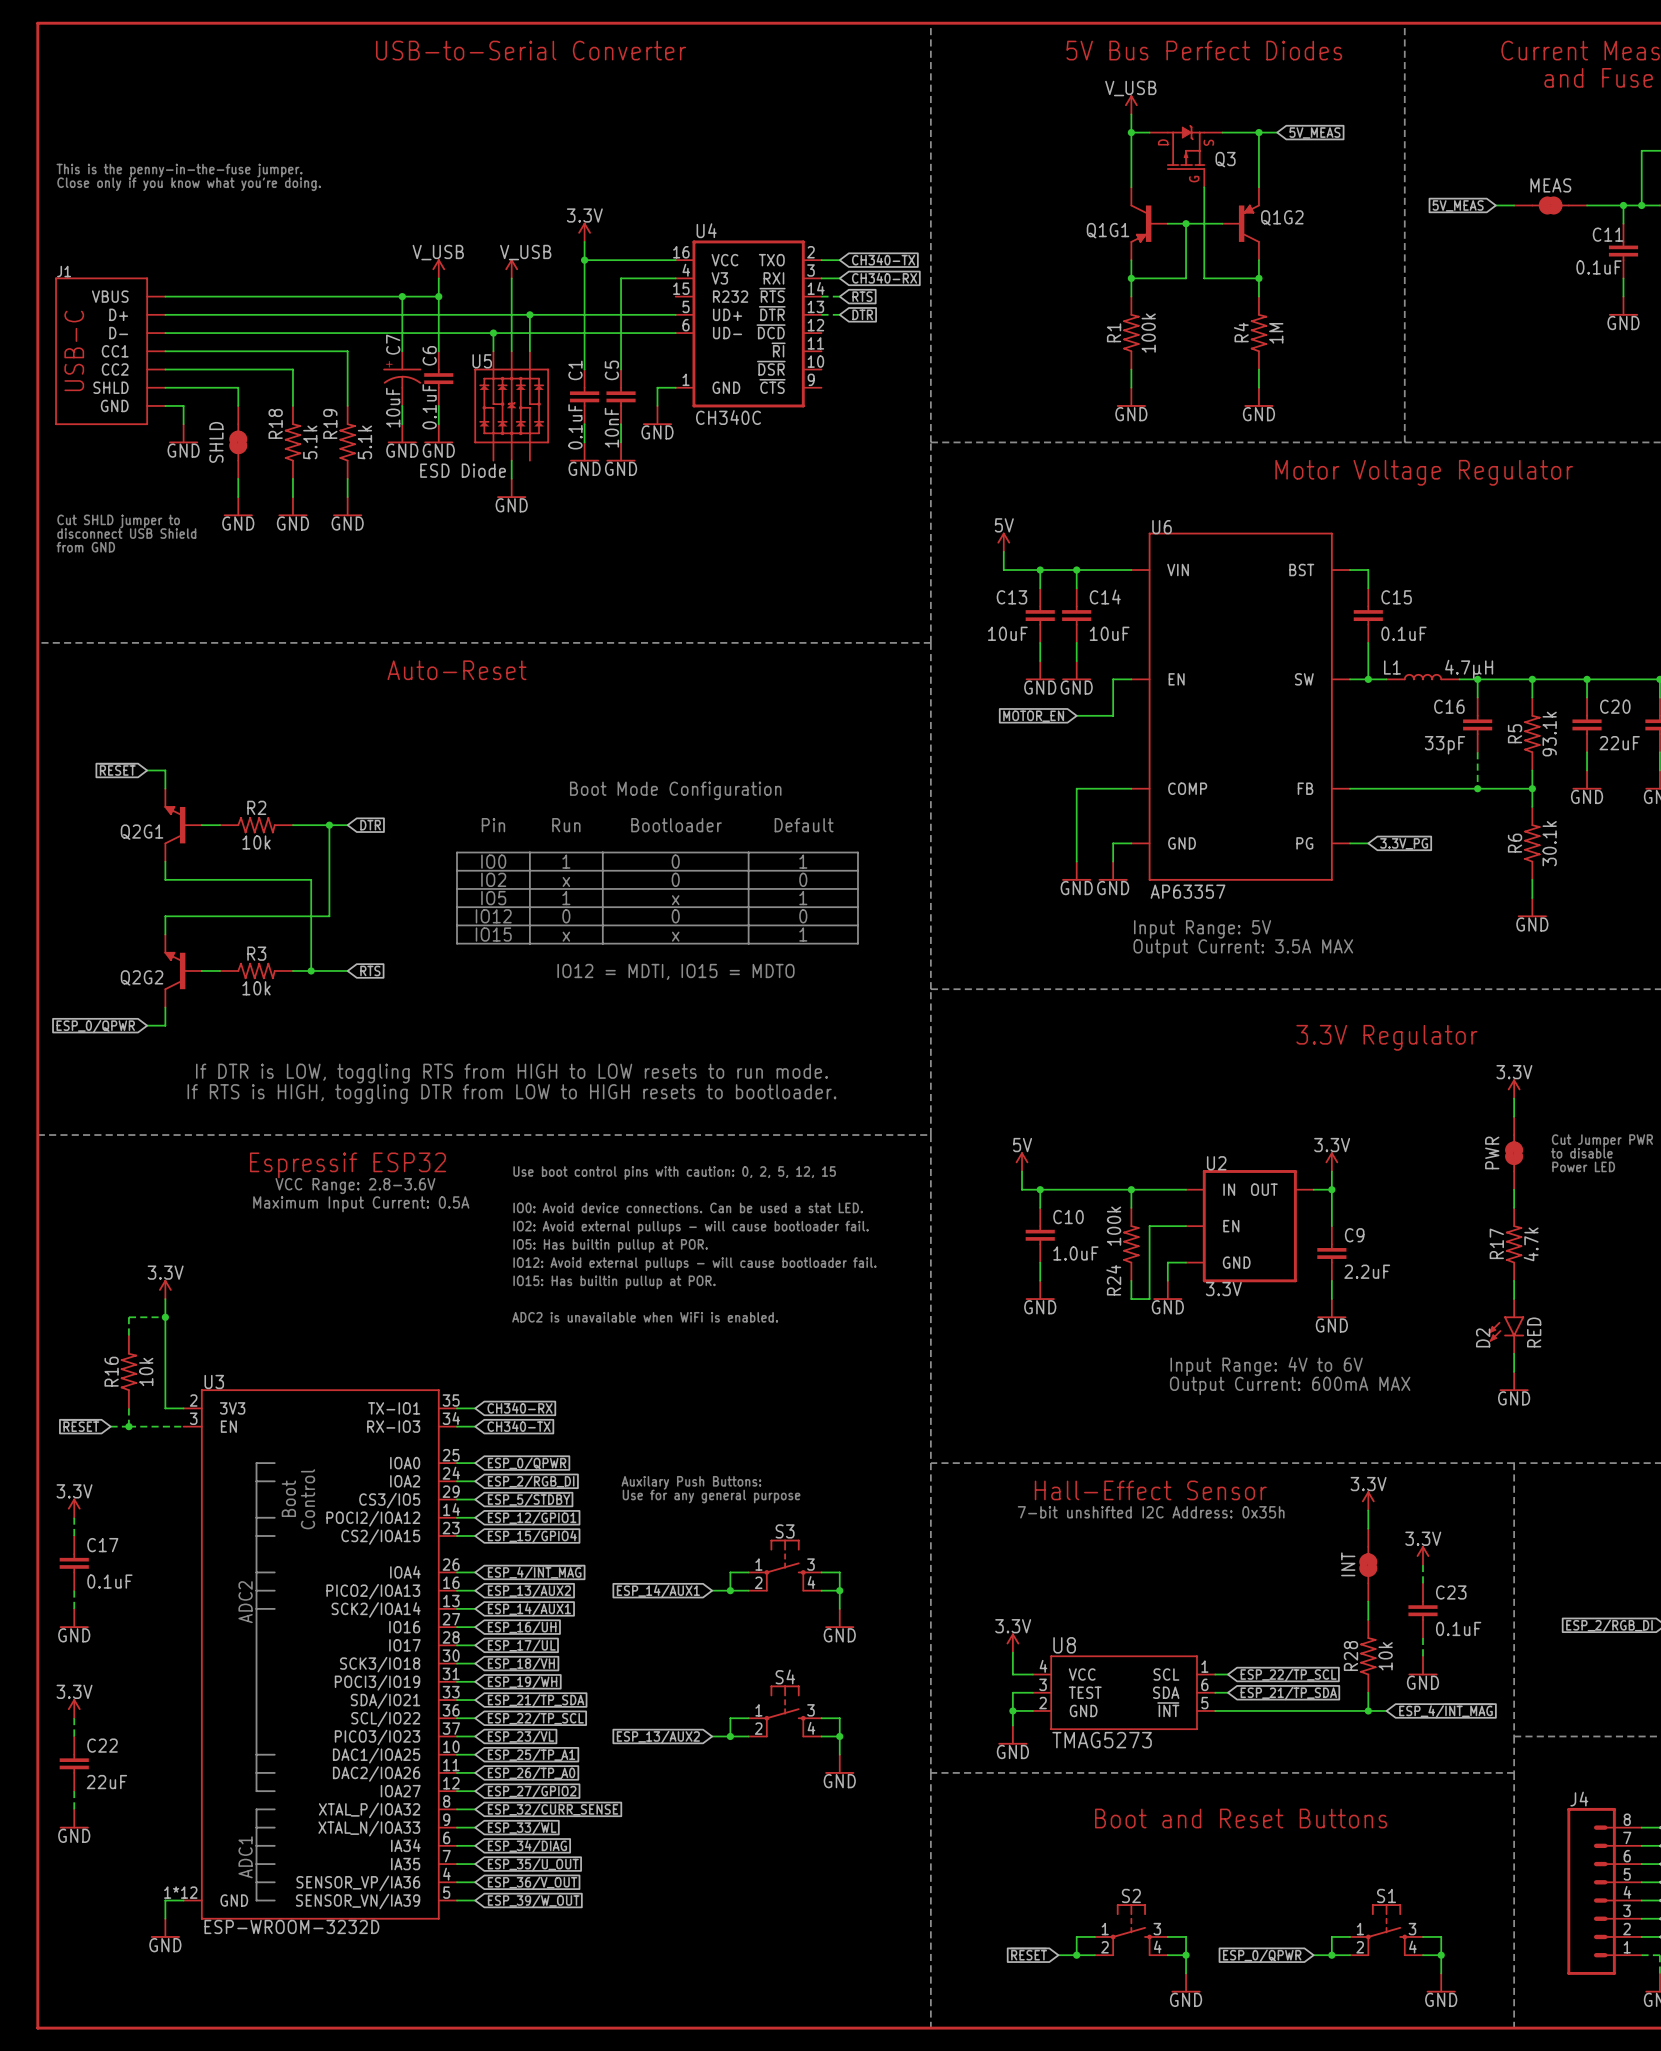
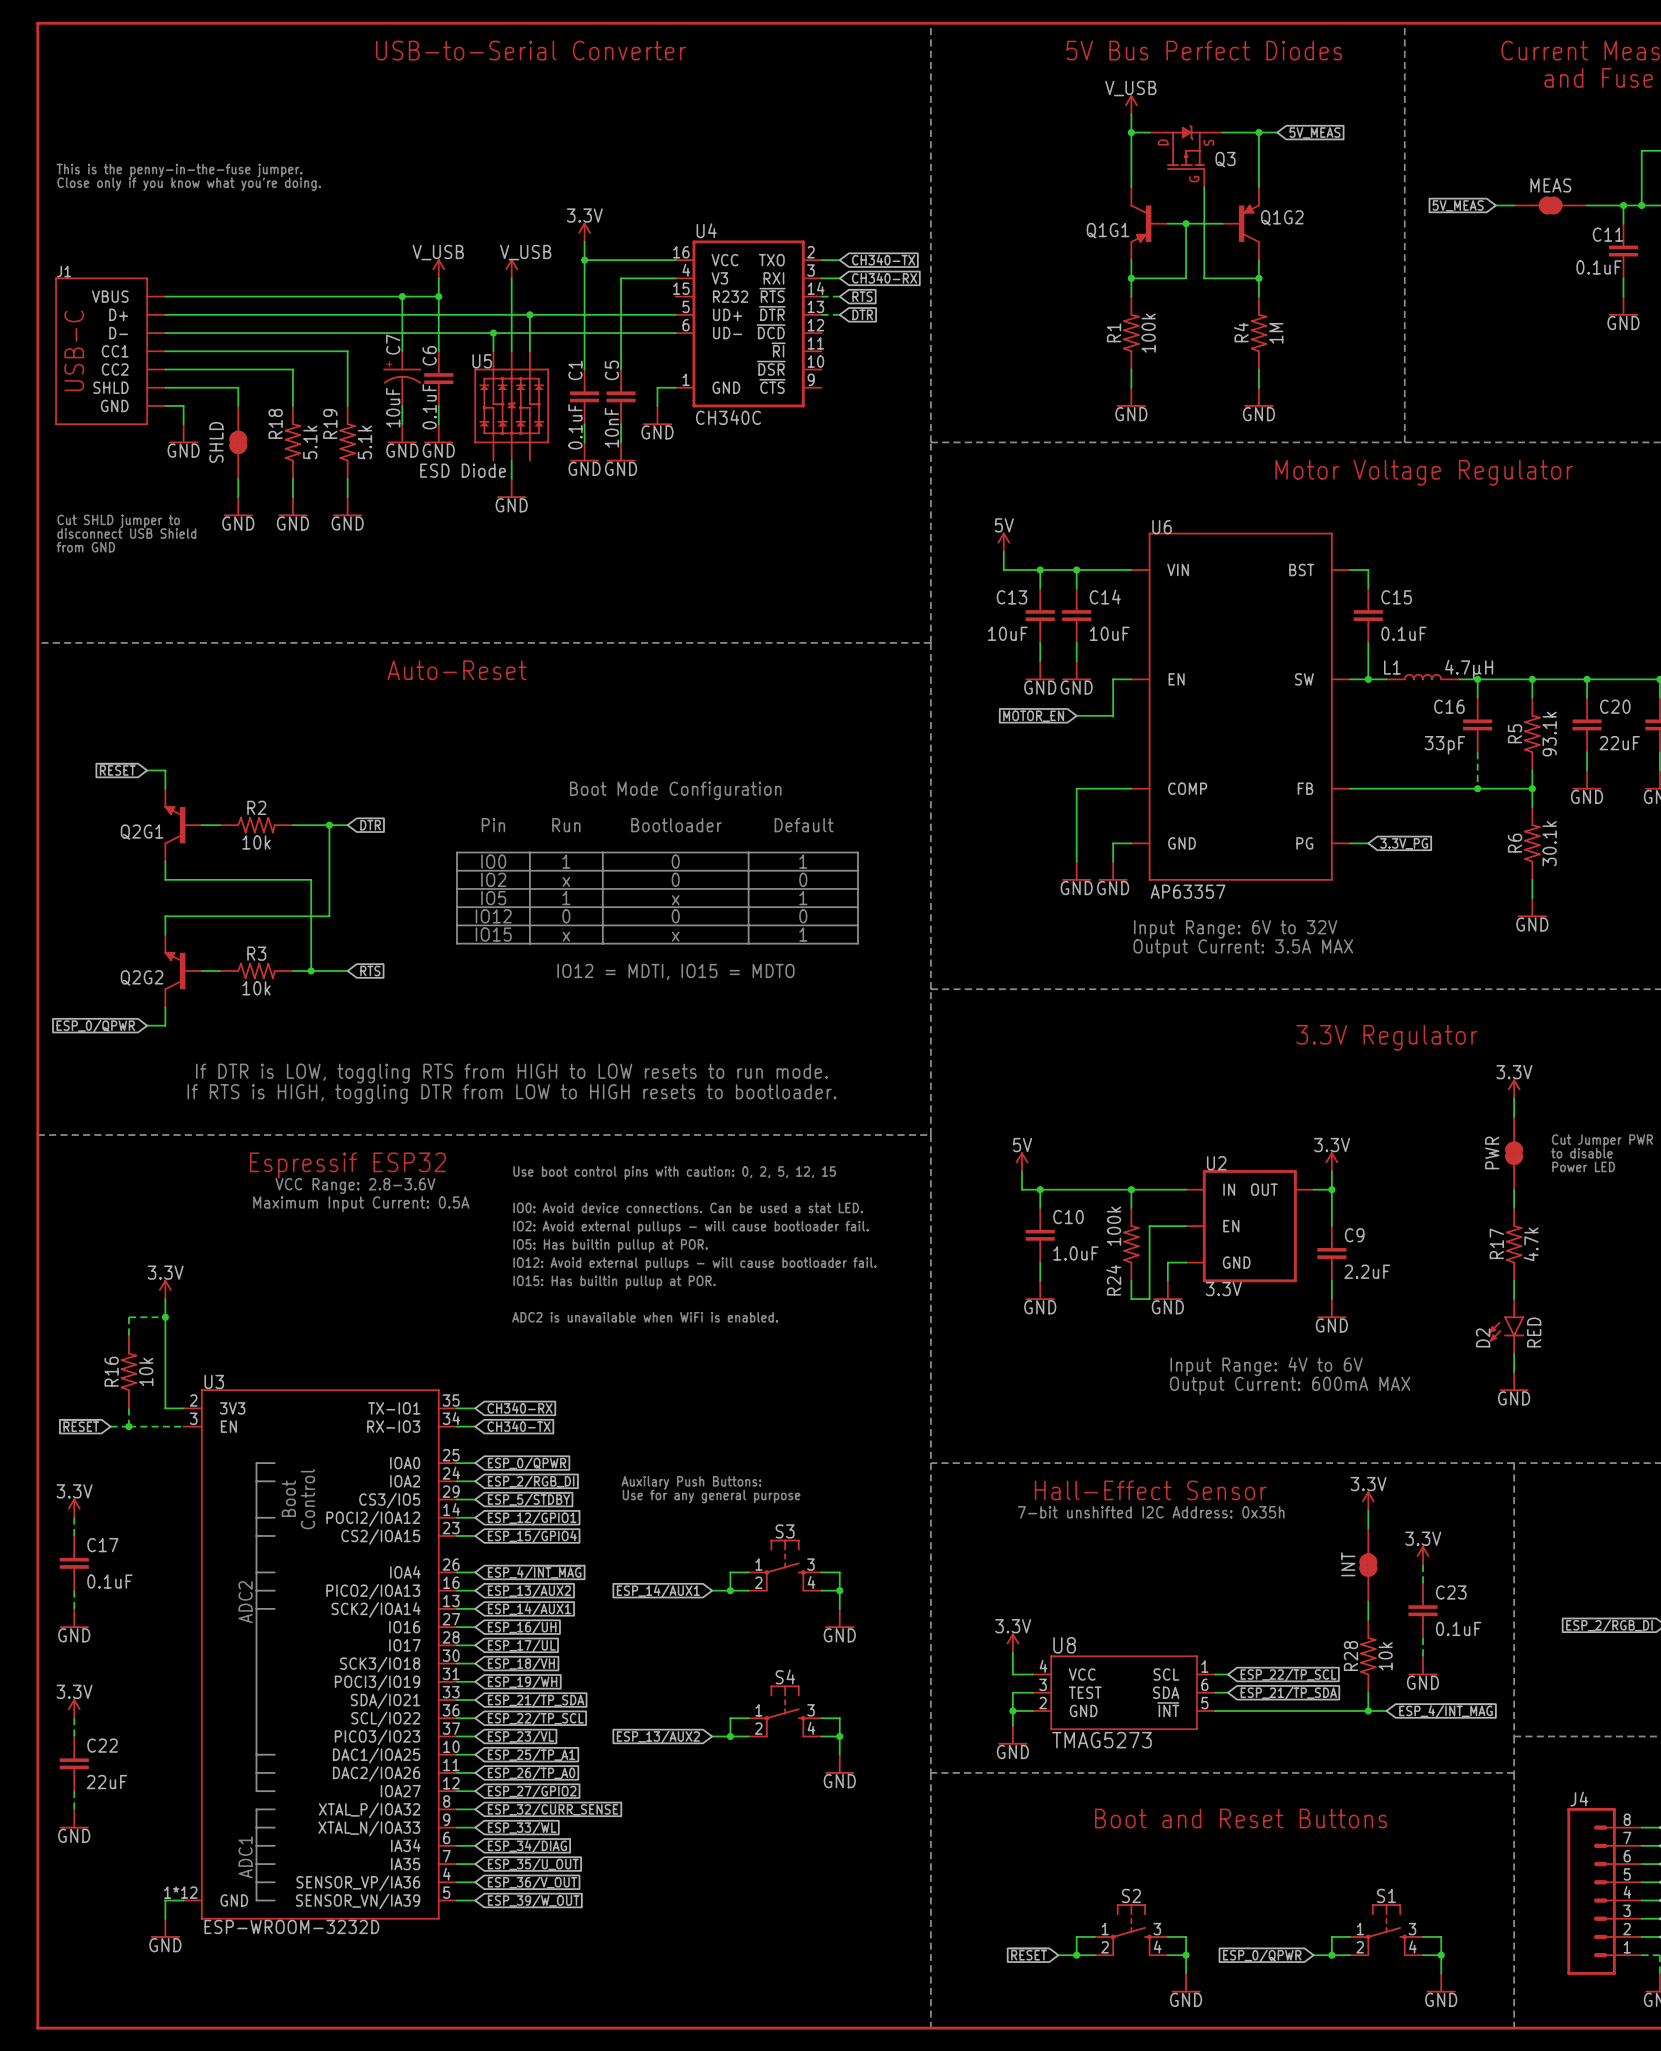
text: Input Range: 5V (1202, 929) -> Input Range: 6V to 32V (1235, 929)

